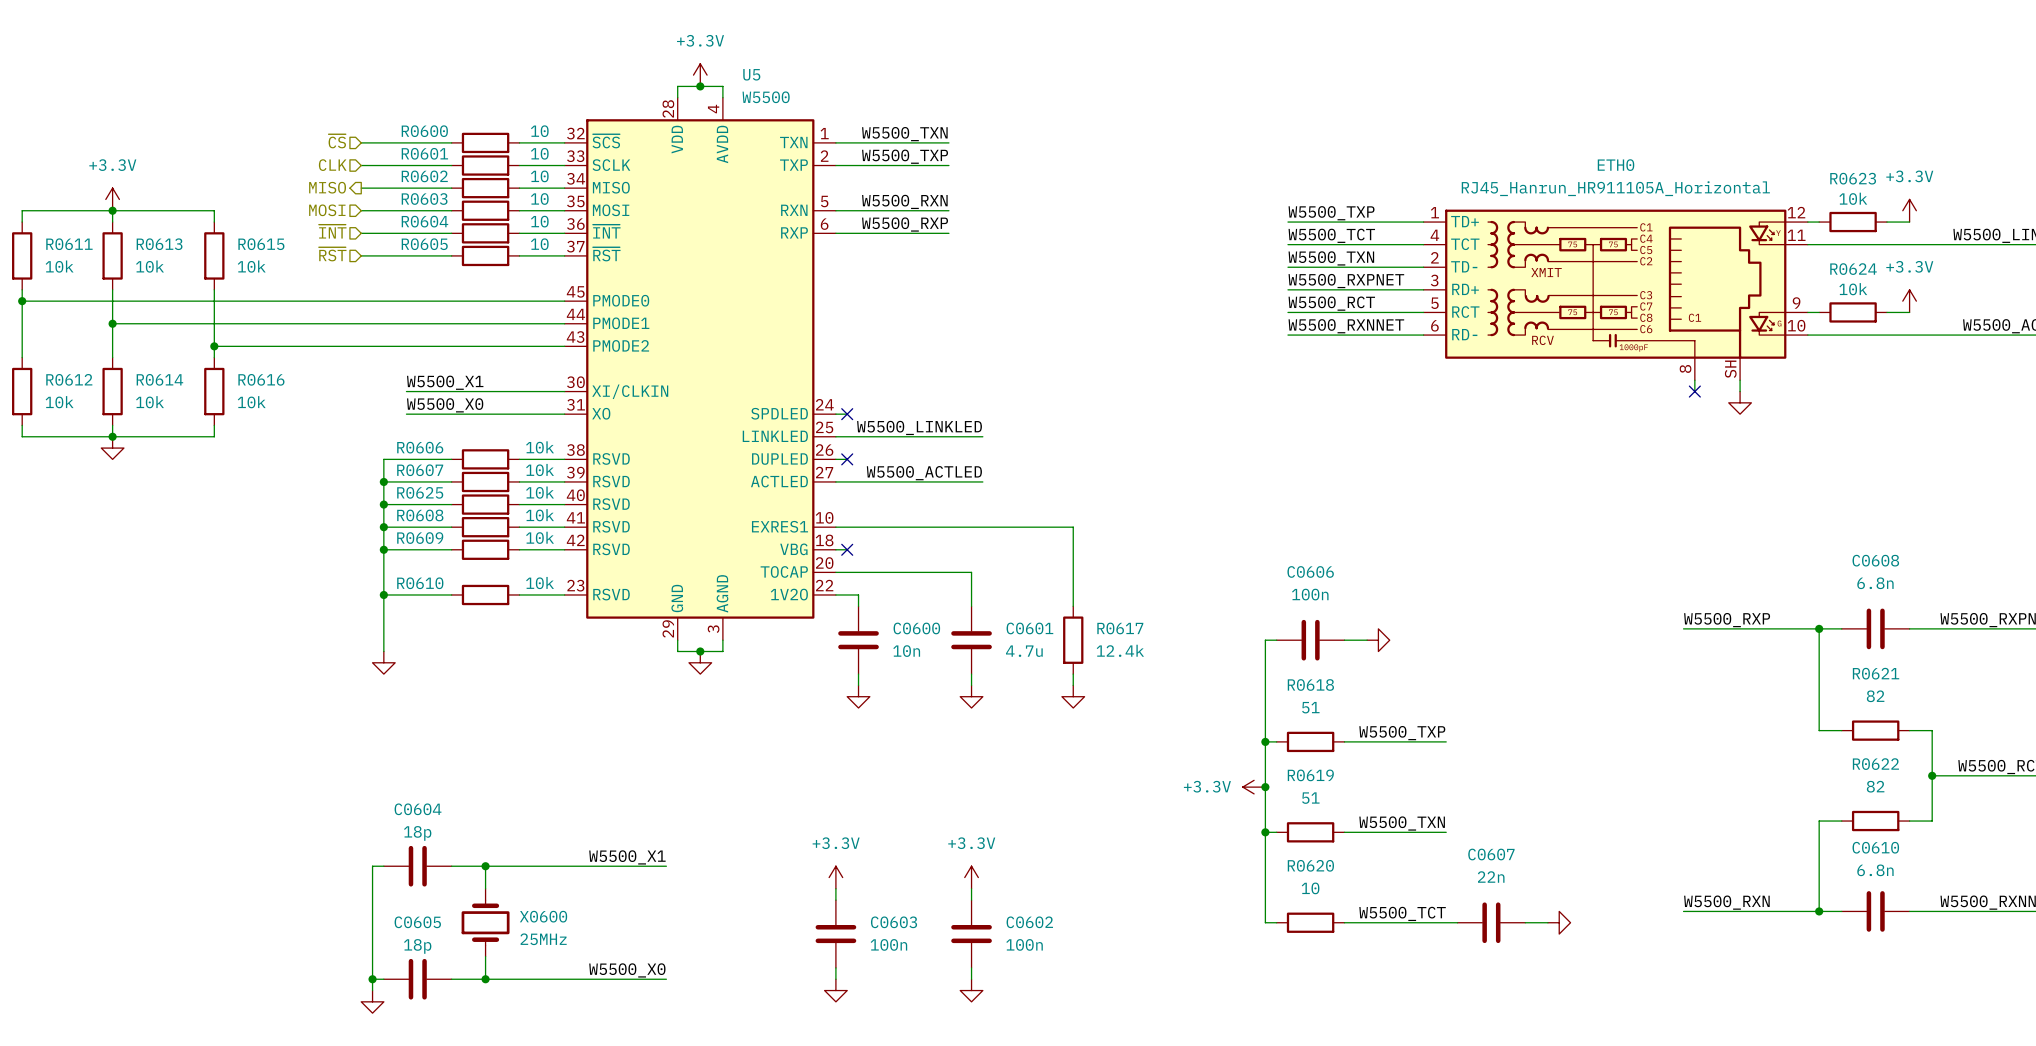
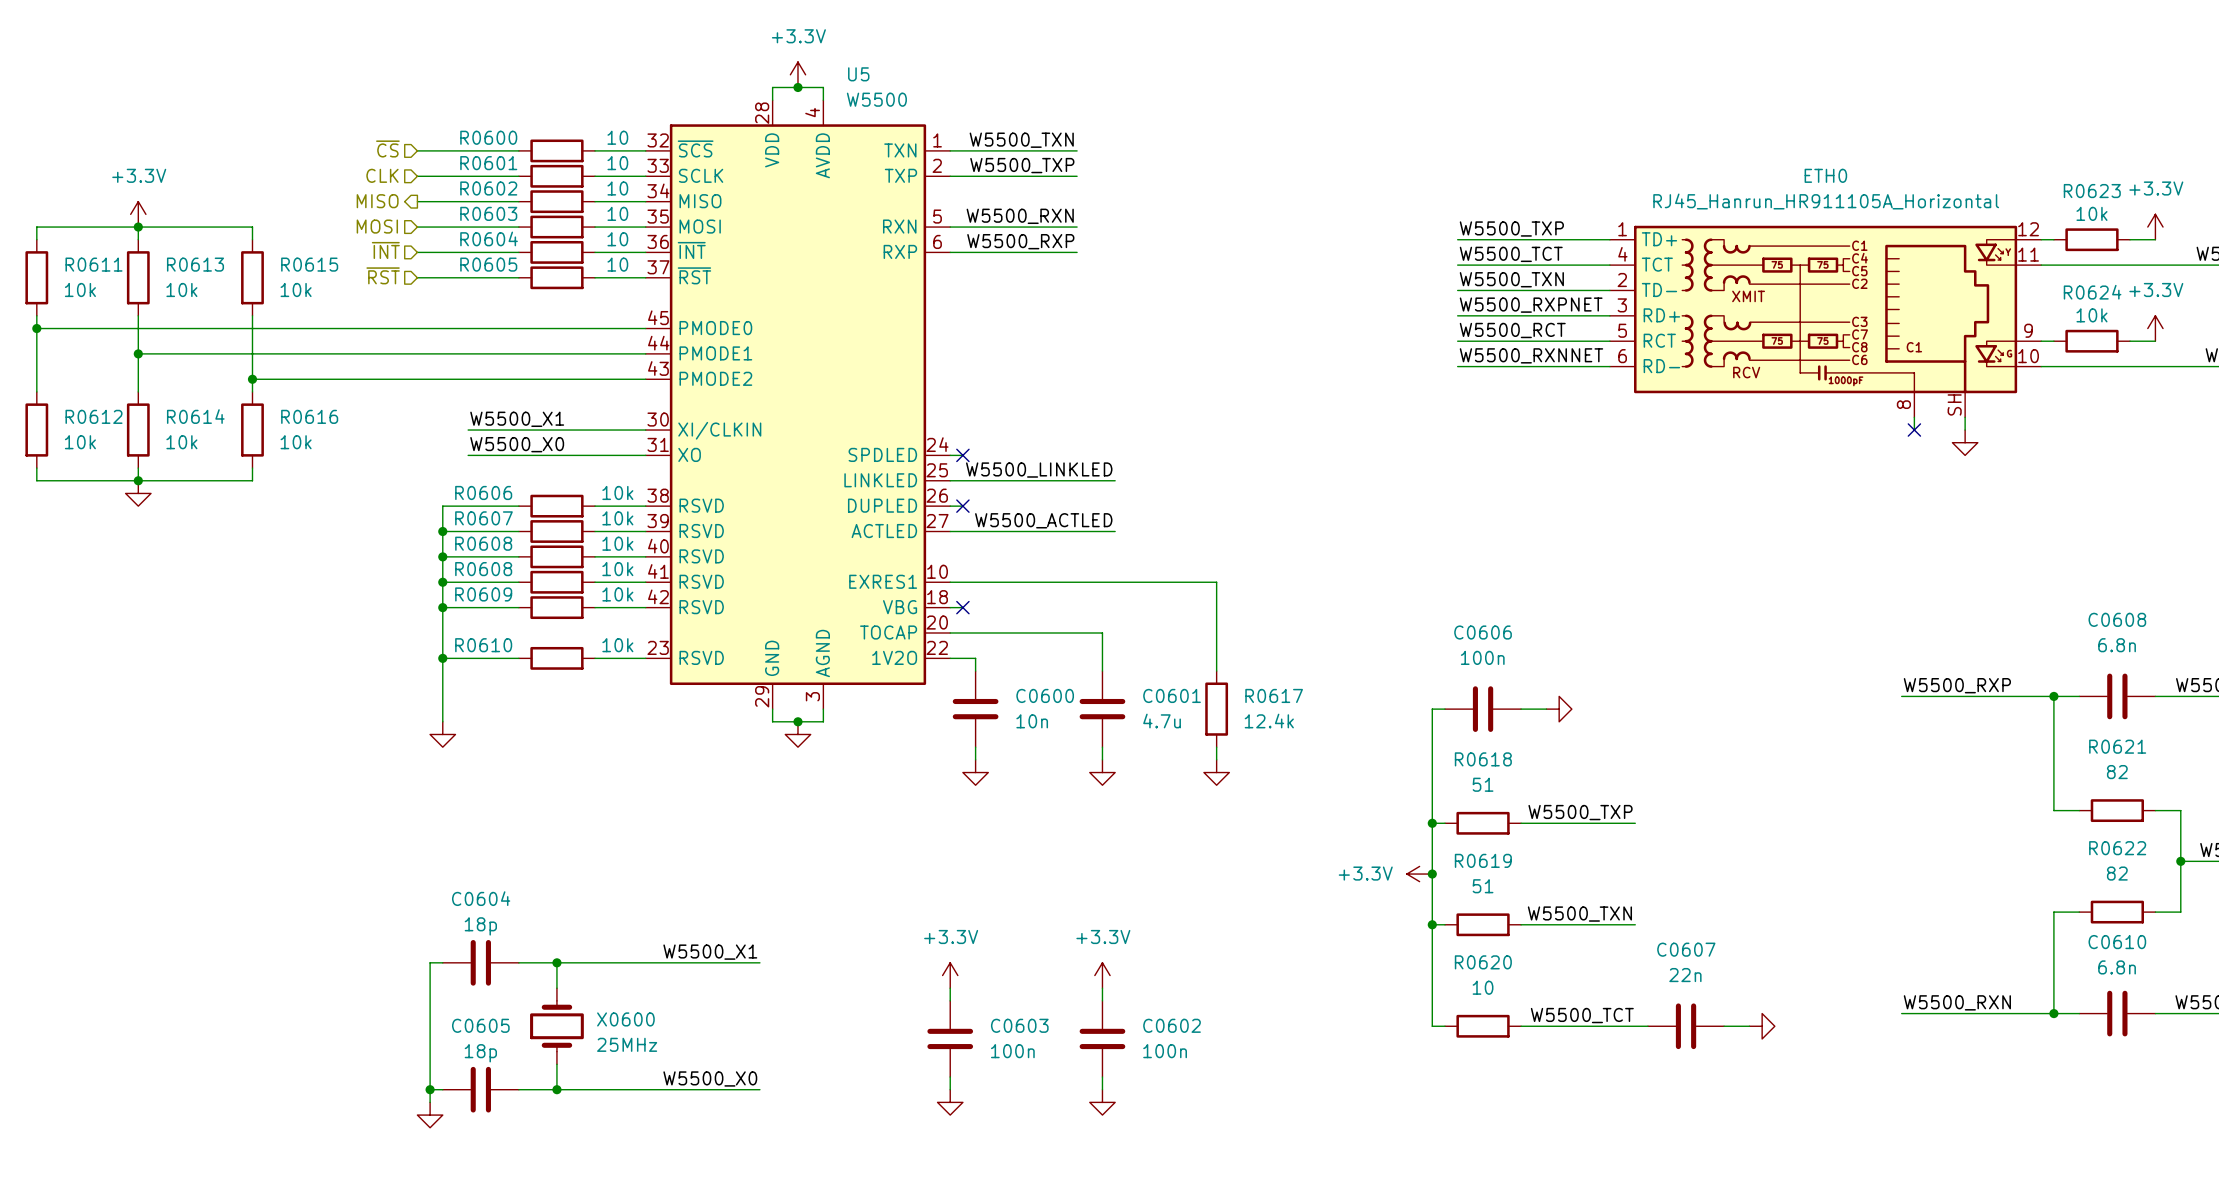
R0625 name: R0625 (420, 492) -> R0608 (483, 543)

